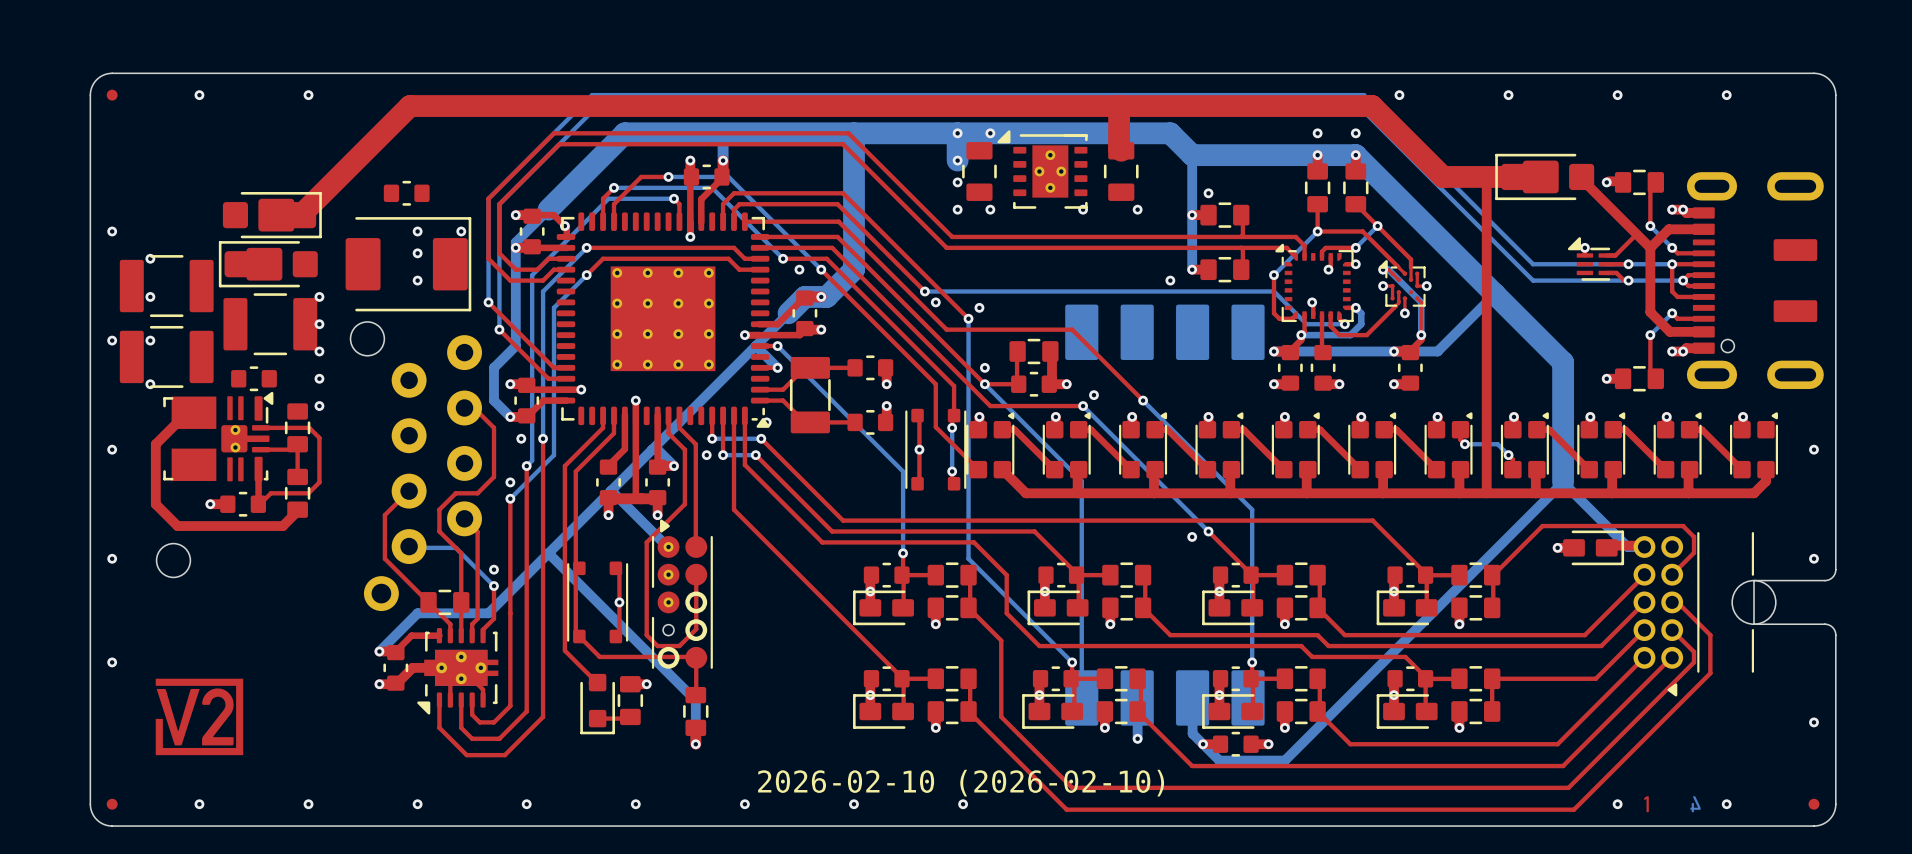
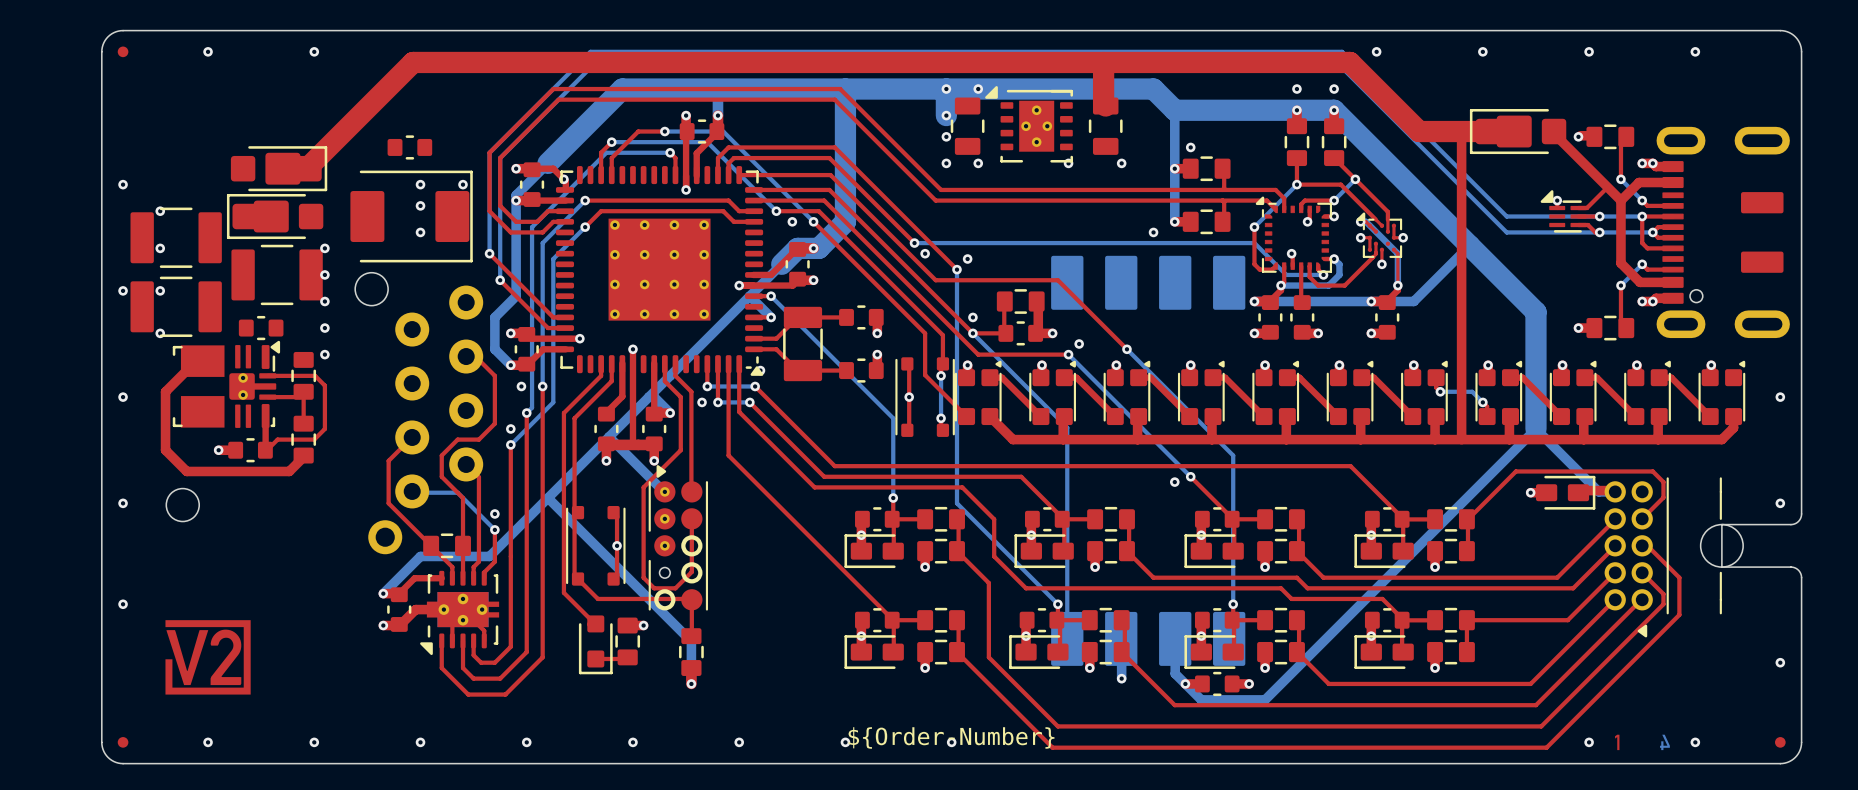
drawing shape: [758, 769, 1165, 797] -> [848, 727, 1055, 749]

